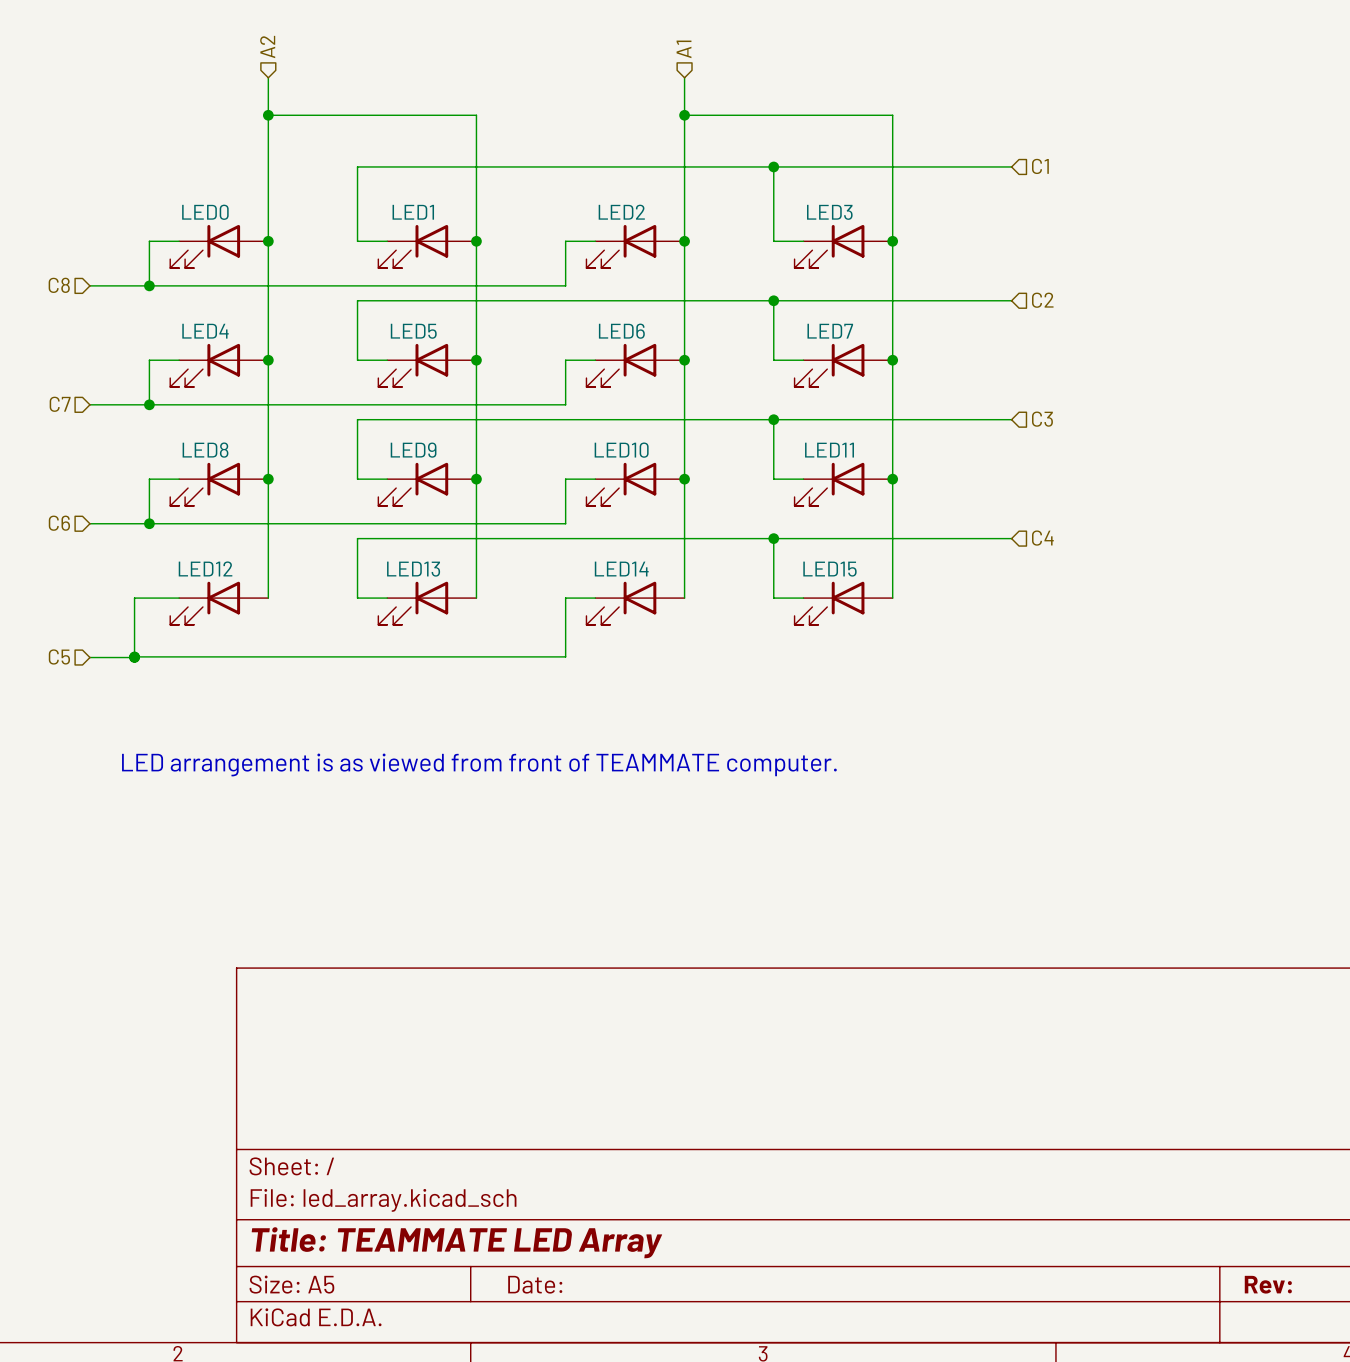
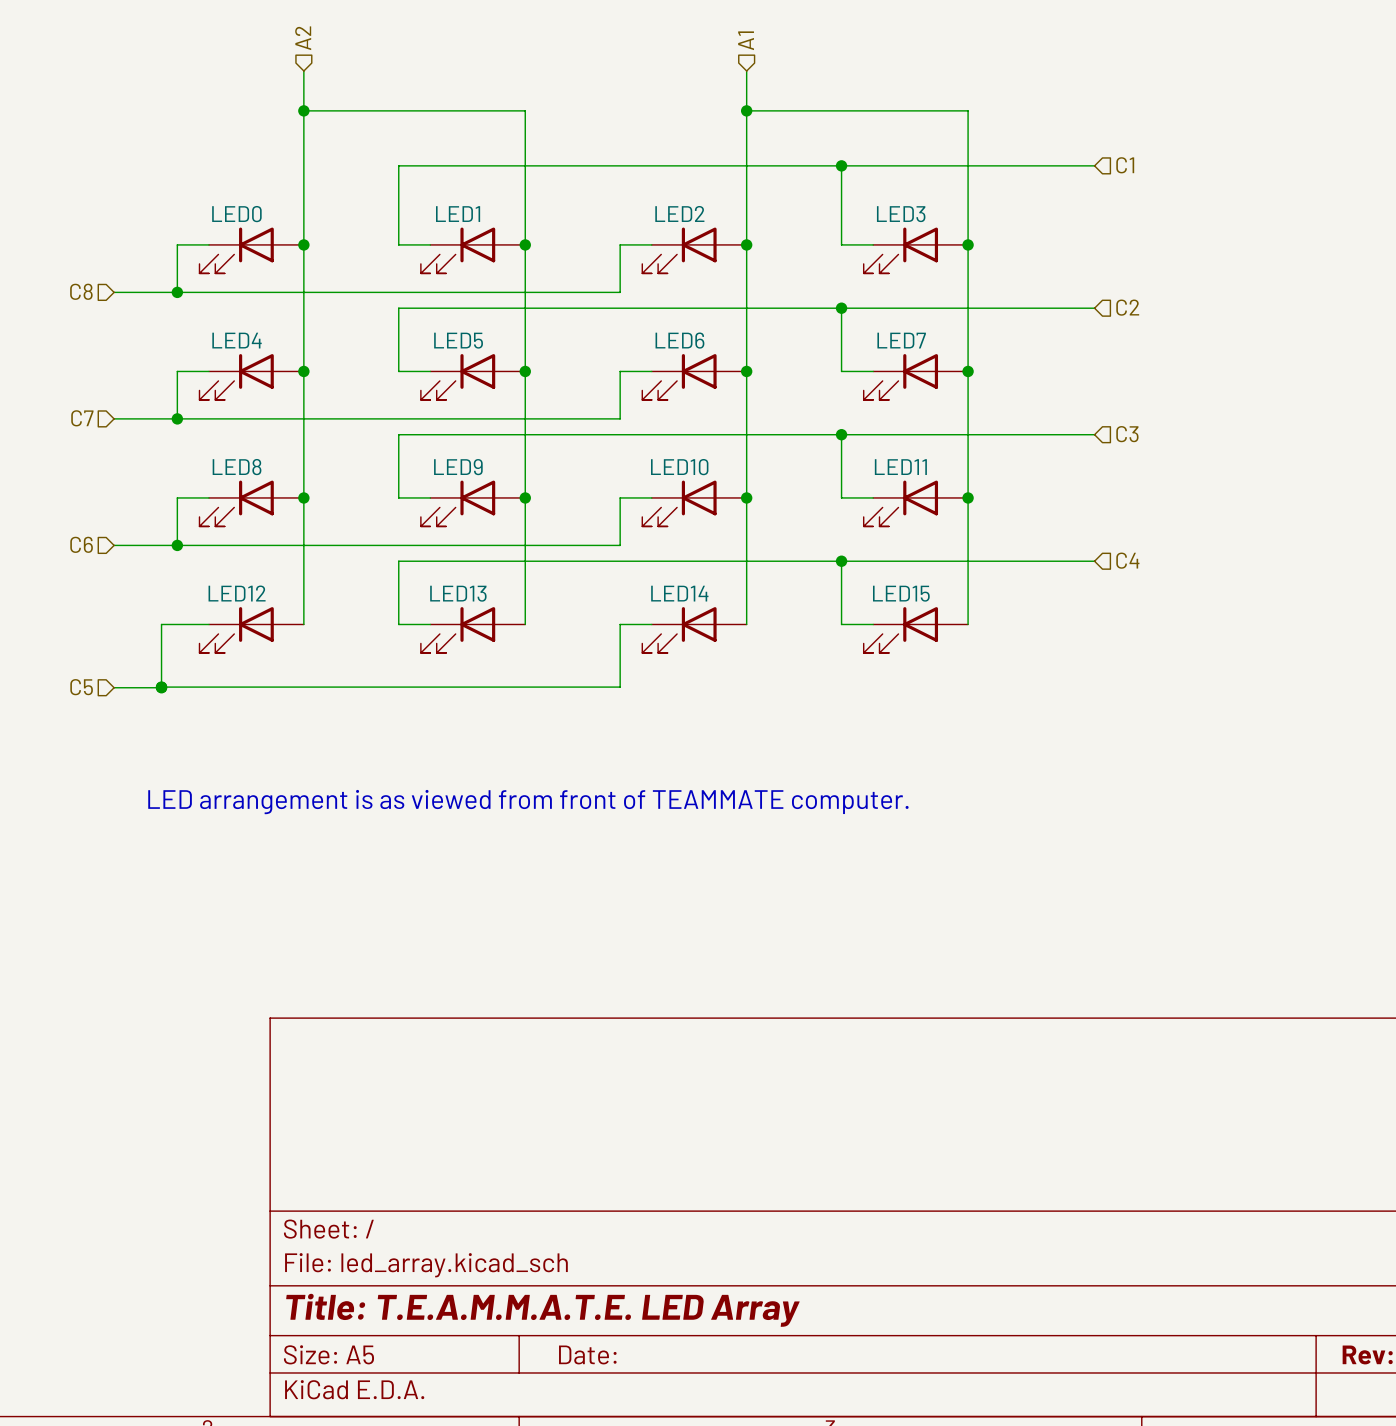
title block: Title: TEAMMATE LED Array (456, 1242) -> Title: T.E.A.M.M.A.T.E. LED Array (542, 1310)

